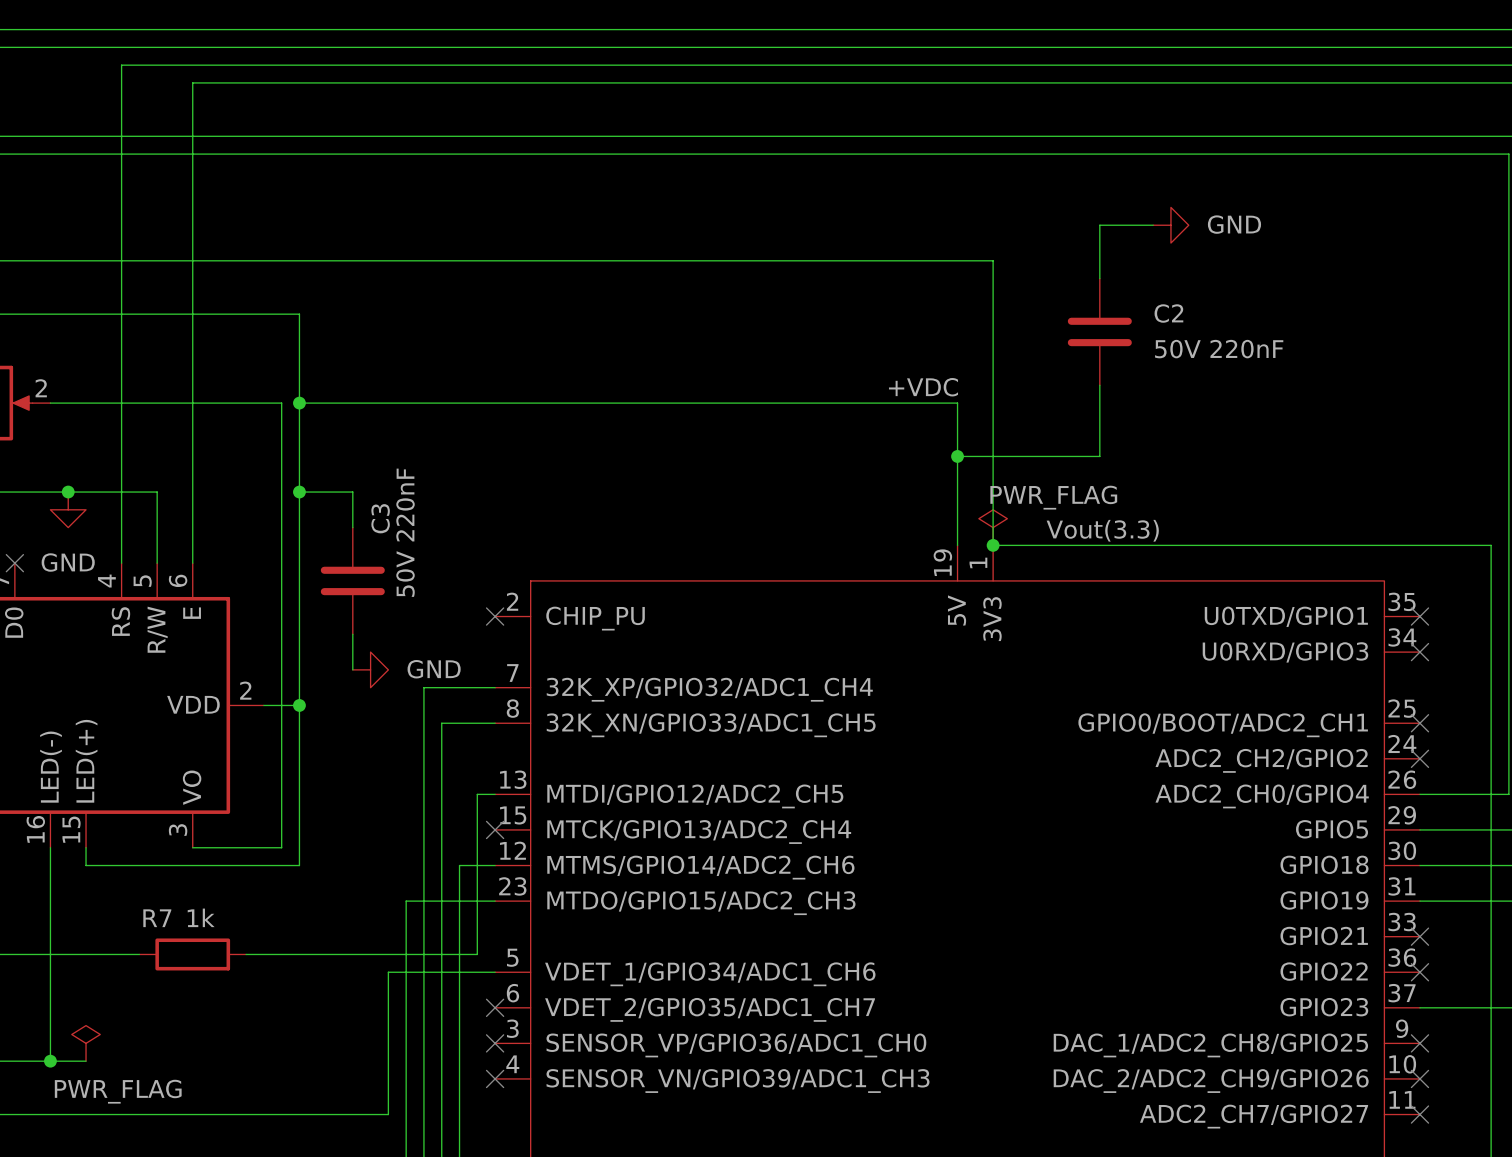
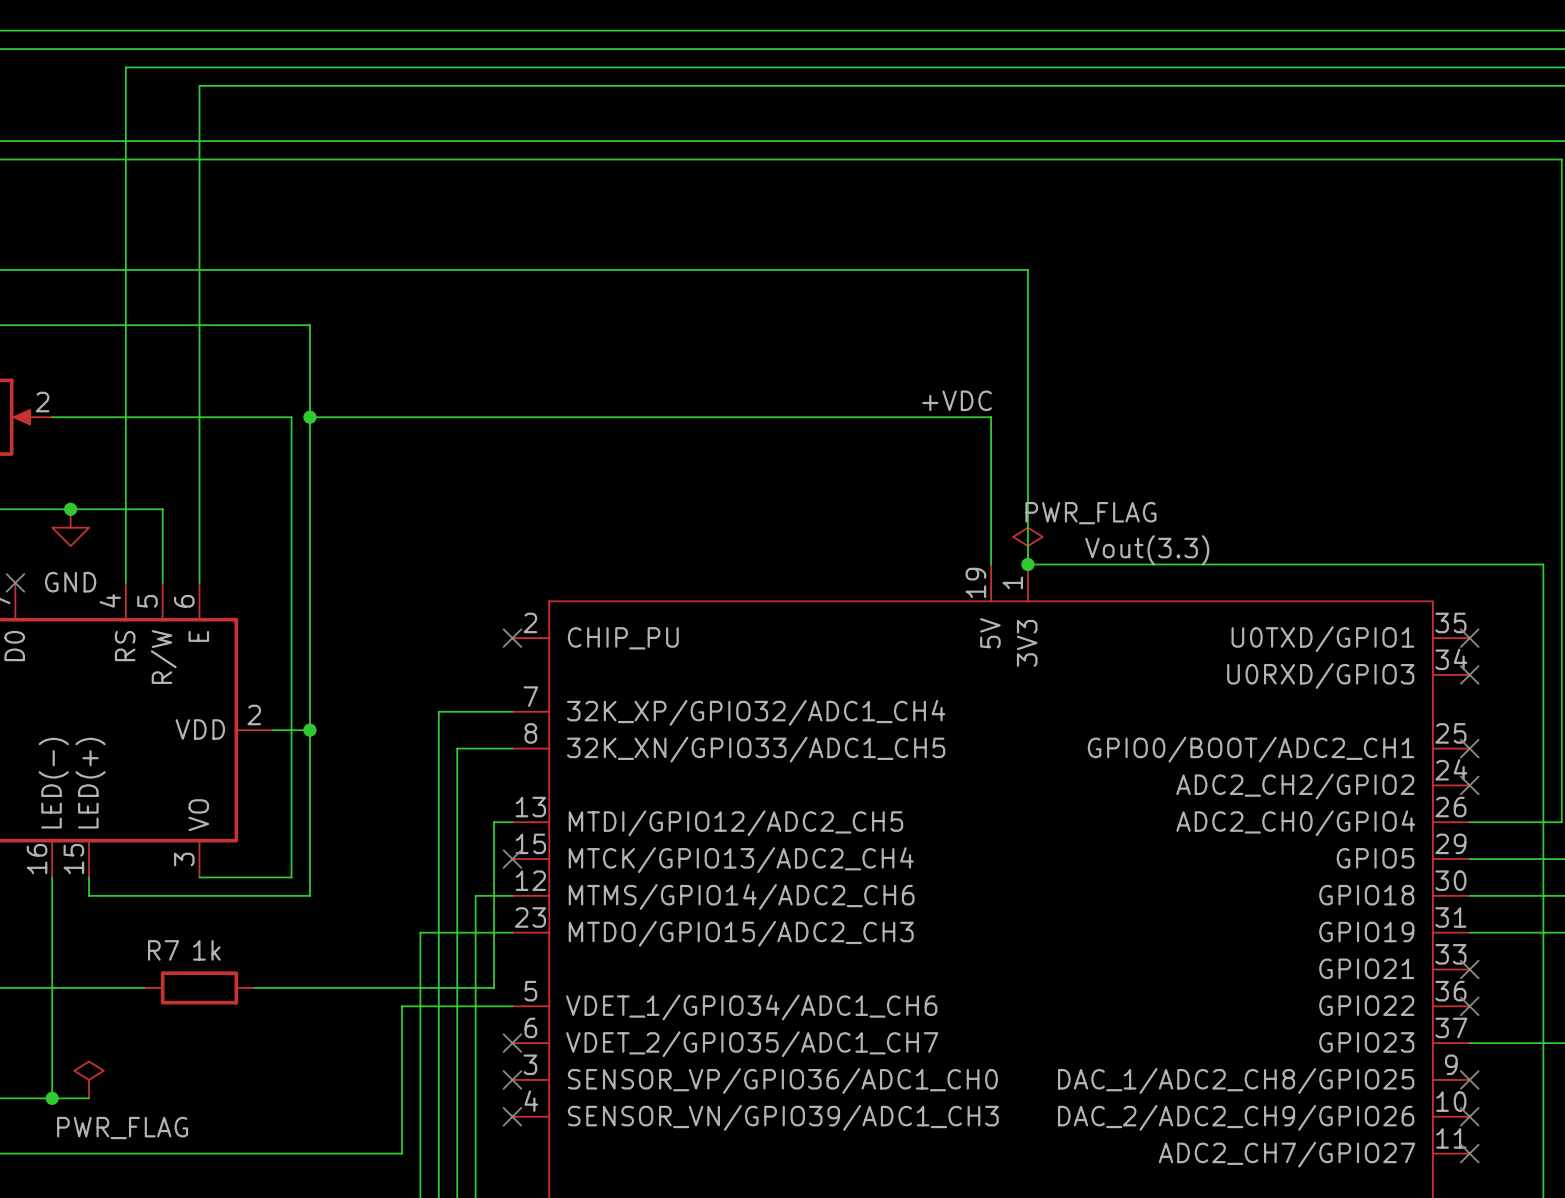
wire: (1153, 225) (1099, 225) (1099, 278) -> none
power symbol: GND (1170, 225) -> none
C2: 50V 220nF (1099, 331) -> none
wire: (1099, 385) (1099, 456) (957, 456) -> none
junction: (957, 456) -> none
wire: (299, 492) (352, 492) (352, 527) -> none
junction: (299, 492) -> none
C3: 50V 220nF (352, 580) -> none
wire: (352, 634) (352, 669) -> none
power symbol: GND (370, 669) -> none

